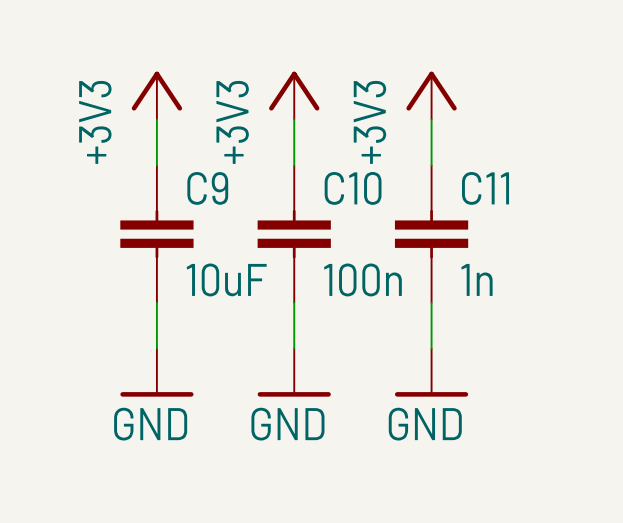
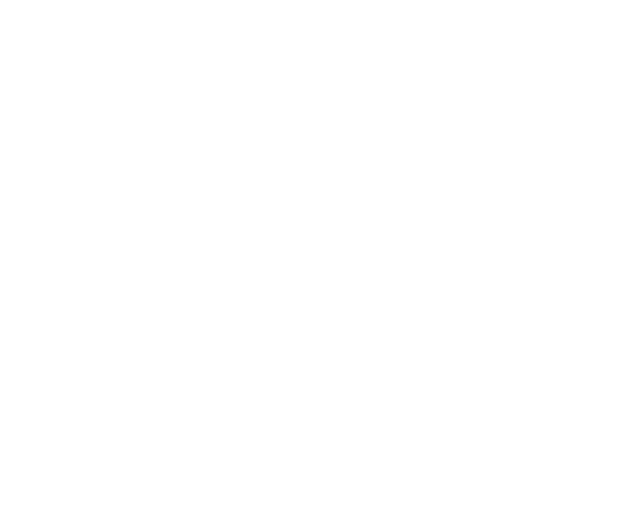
power symbol: +3V3 (156, 95) -> none
power symbol: +3V3 (294, 95) -> none
power symbol: +3V3 (431, 95) -> none
wire: (156, 119) (156, 165) -> none
wire: (294, 119) (294, 165) -> none
wire: (431, 119) (431, 165) -> none
C9: 10uF (156, 234) -> none
C10: 100n (294, 234) -> none
C11: 1n (431, 234) -> none
wire: (156, 302) (156, 348) -> none
wire: (294, 302) (294, 348) -> none
wire: (431, 302) (431, 348) -> none
power symbol: GND (156, 372) -> none
power symbol: GND (294, 372) -> none
power symbol: GND (431, 372) -> none

